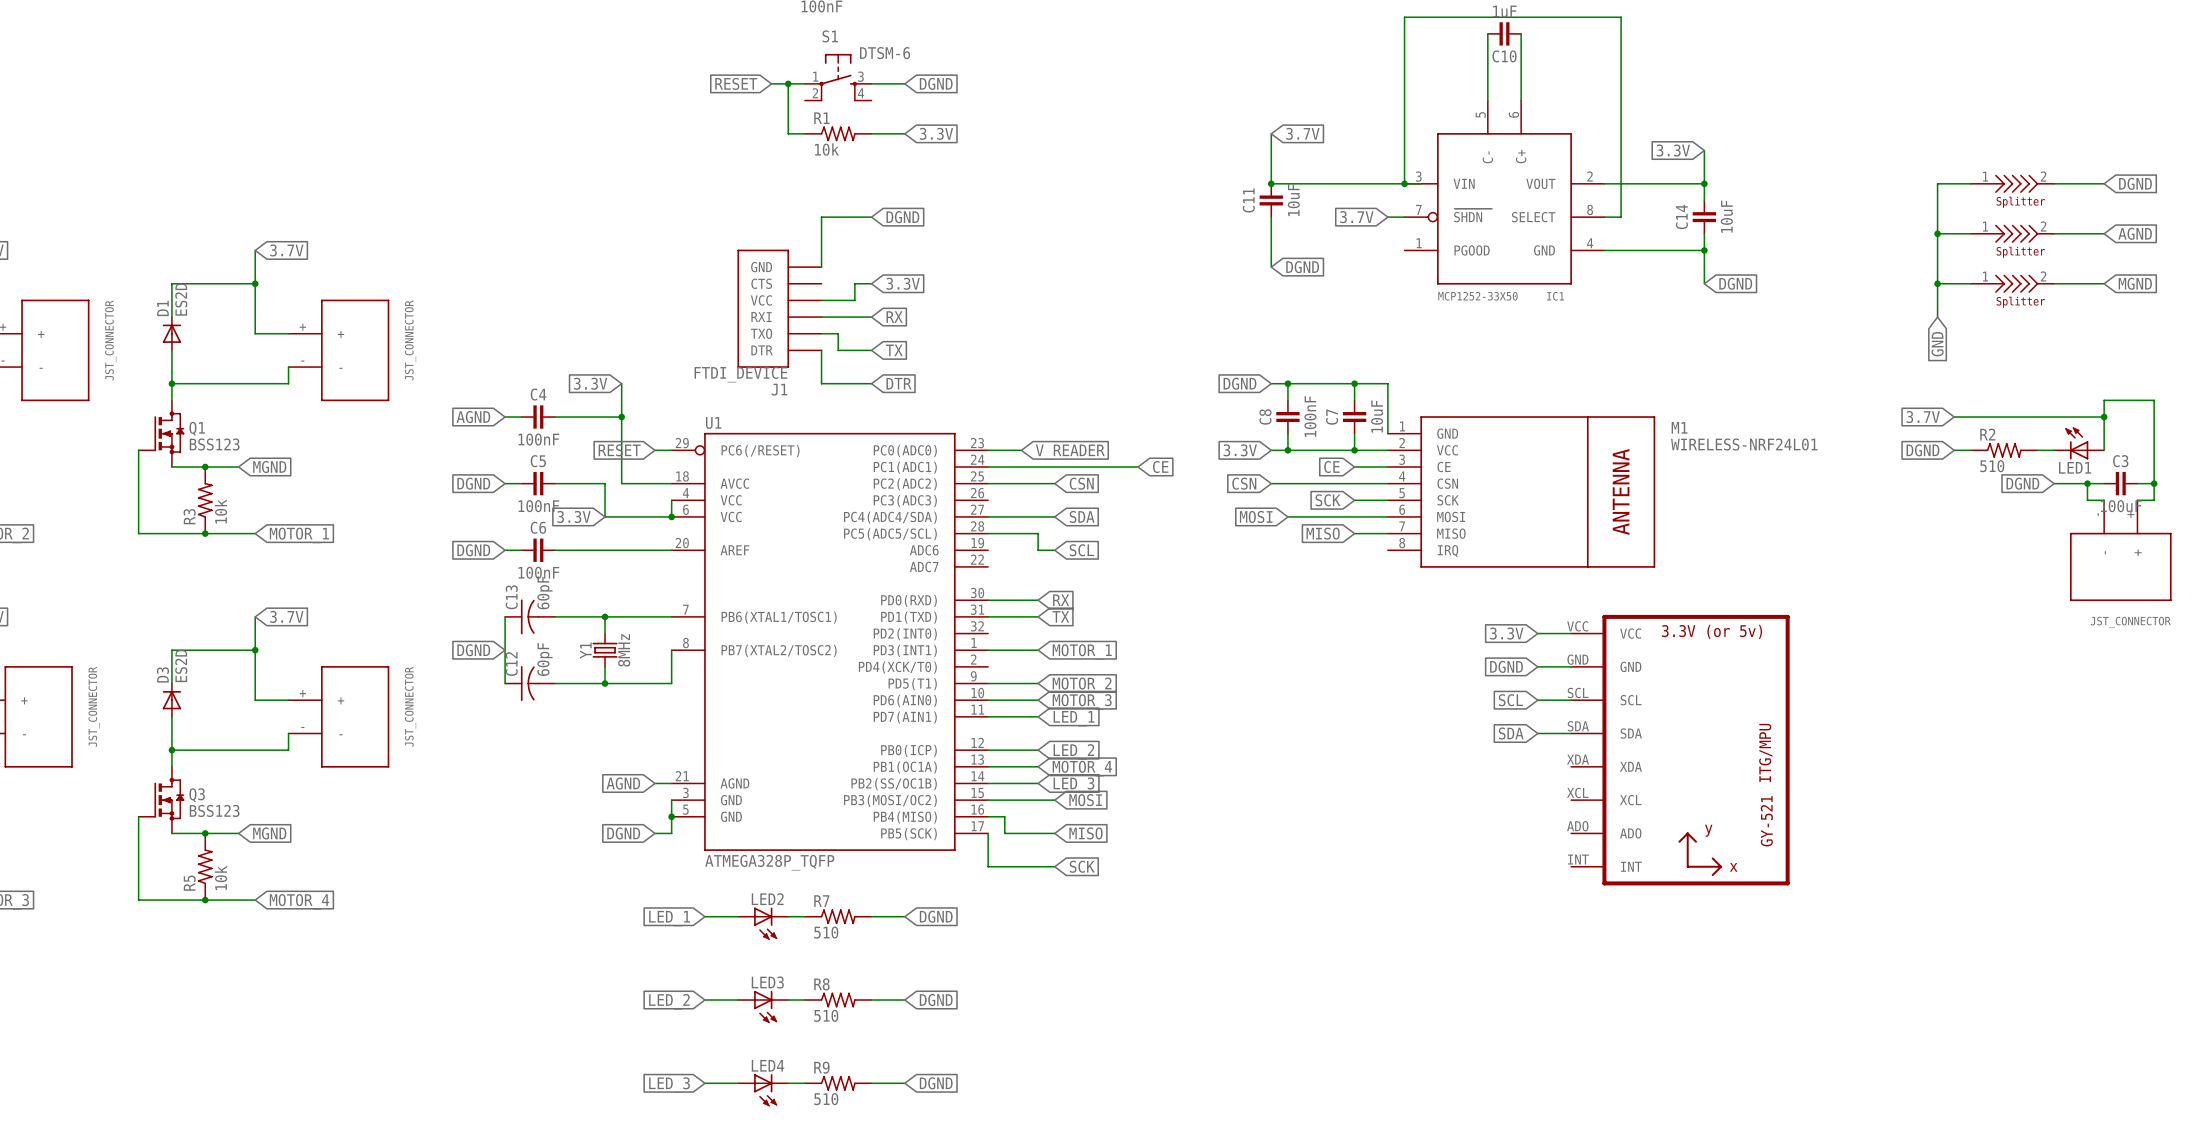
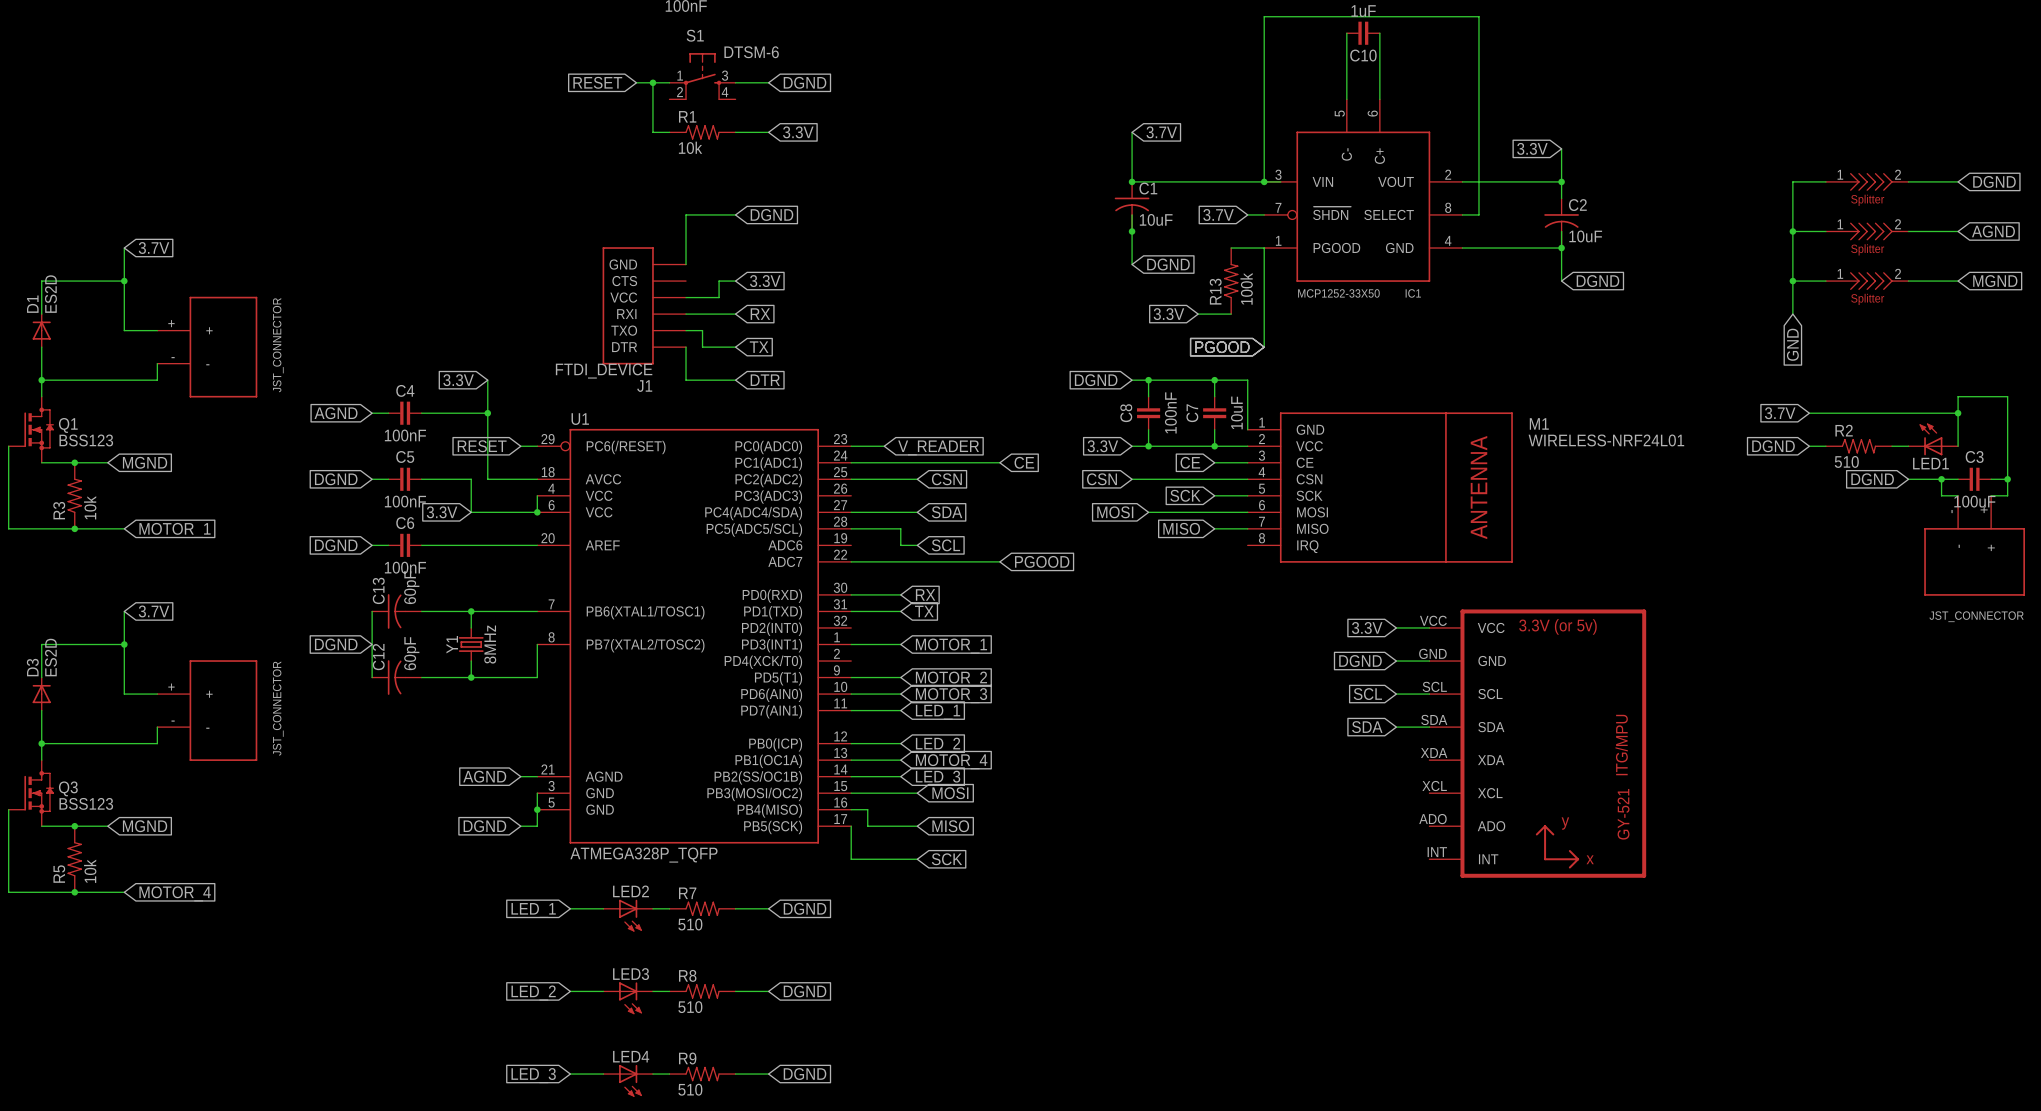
C11: 10uF (1271, 200) -> none
C1: none -> 10uF (1132, 206)
C14: 10uF (1704, 217) -> none
C2: none -> 10uF (1561, 223)
junction: none -> (1132, 231)
wire: none -> (1231, 248) (1264, 248) (1264, 347)
R13: none -> 100k (1231, 281)
global label: none -> 3.3V (1168, 314)
wire: none -> (1198, 314) (1231, 314)
global label: none -> PGOOD (1222, 347)
wire: none -> (851, 561) (999, 561)
global label: none -> PGOOD (1042, 561)

